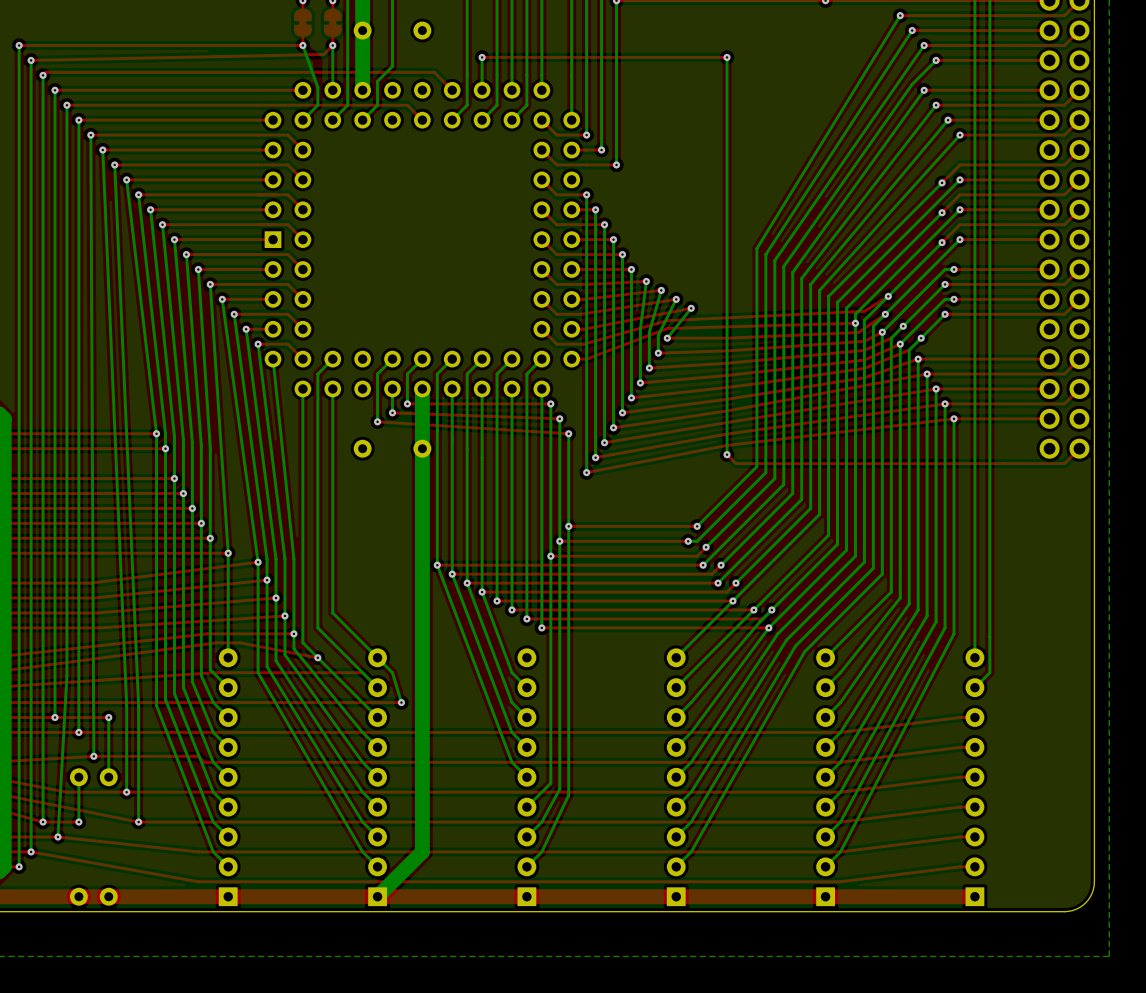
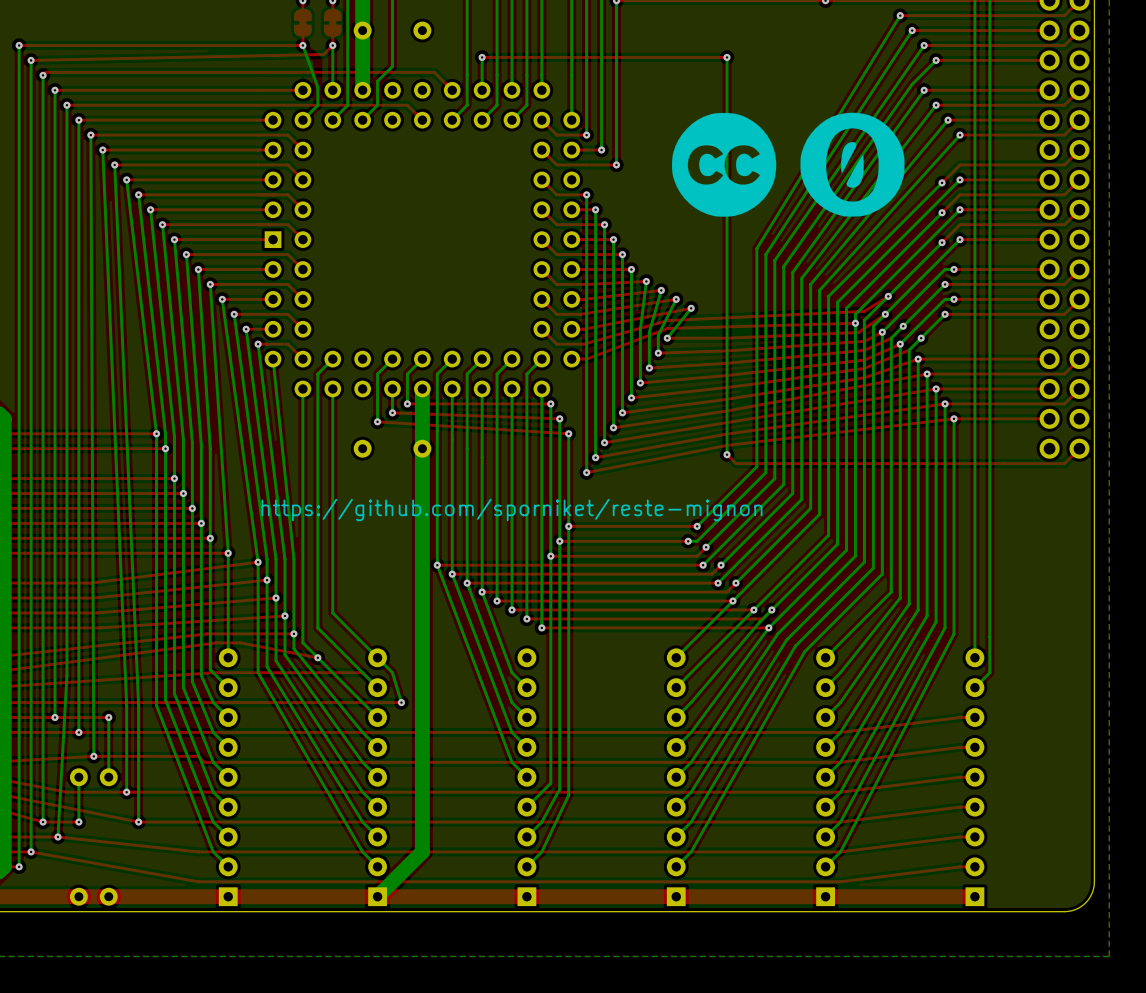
drawing: none -> [671, 112, 777, 217]
drawing: none -> [800, 112, 905, 217]
text: none -> https://github.com/sporniket/reste-mignon (511, 510)

